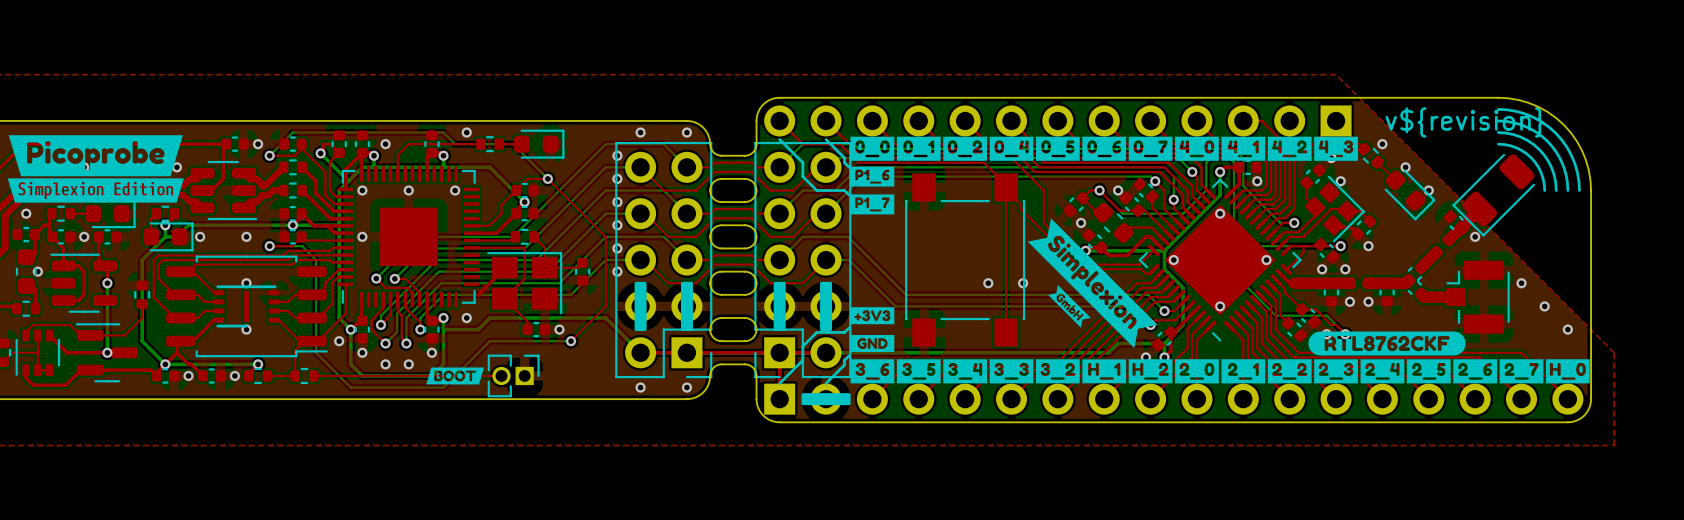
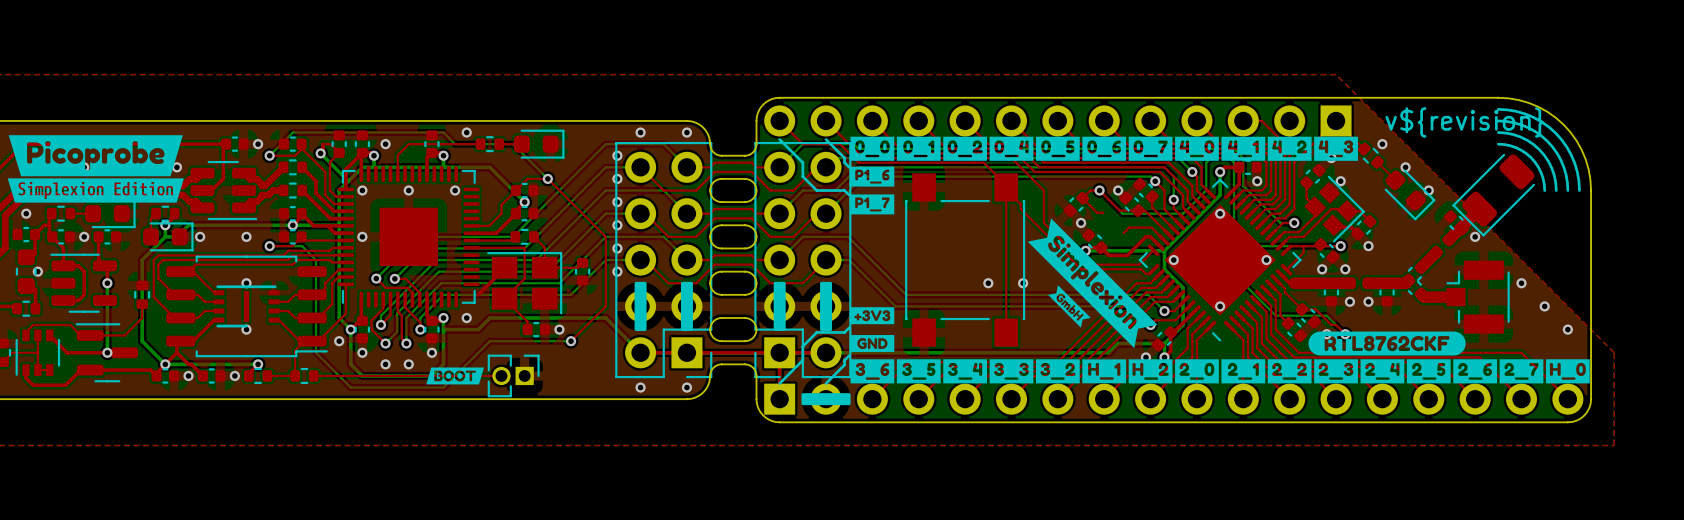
part: (1113, 222) -> none

